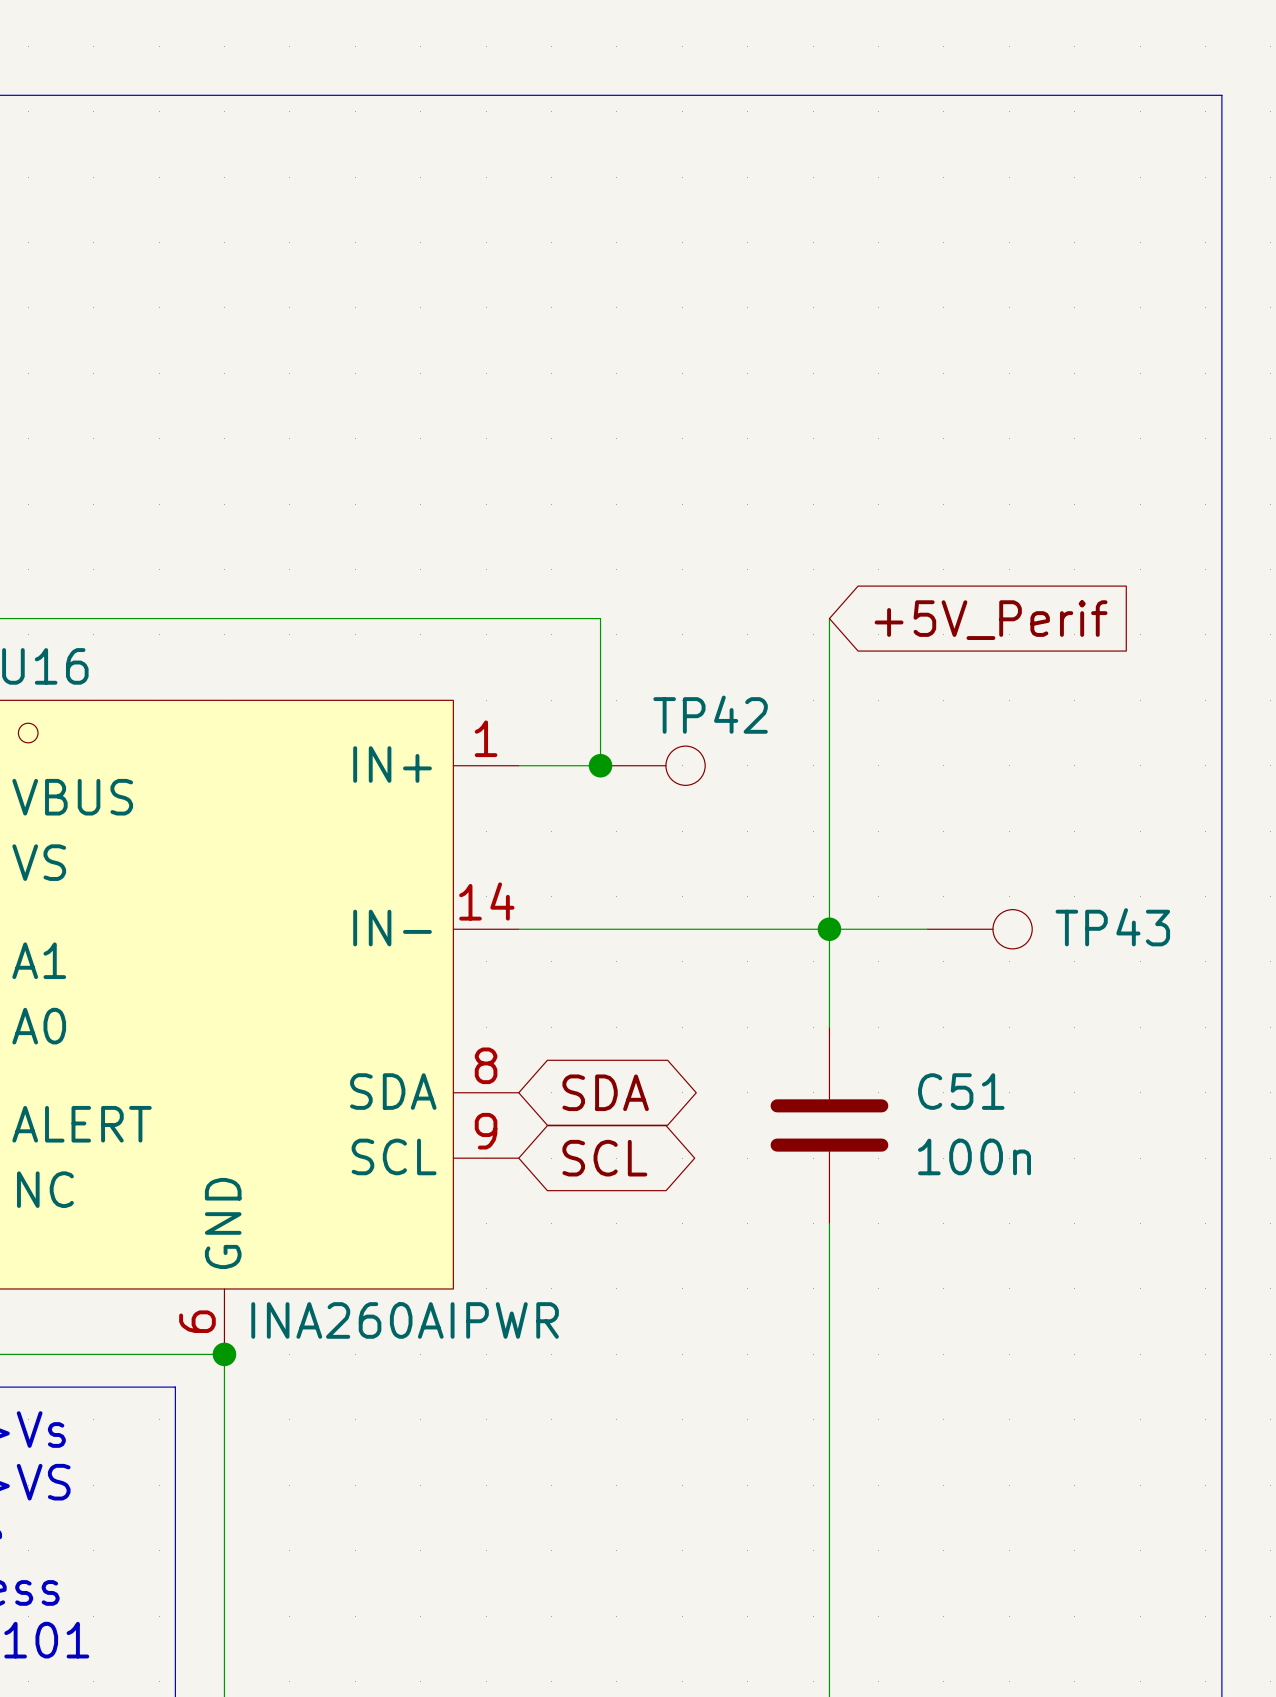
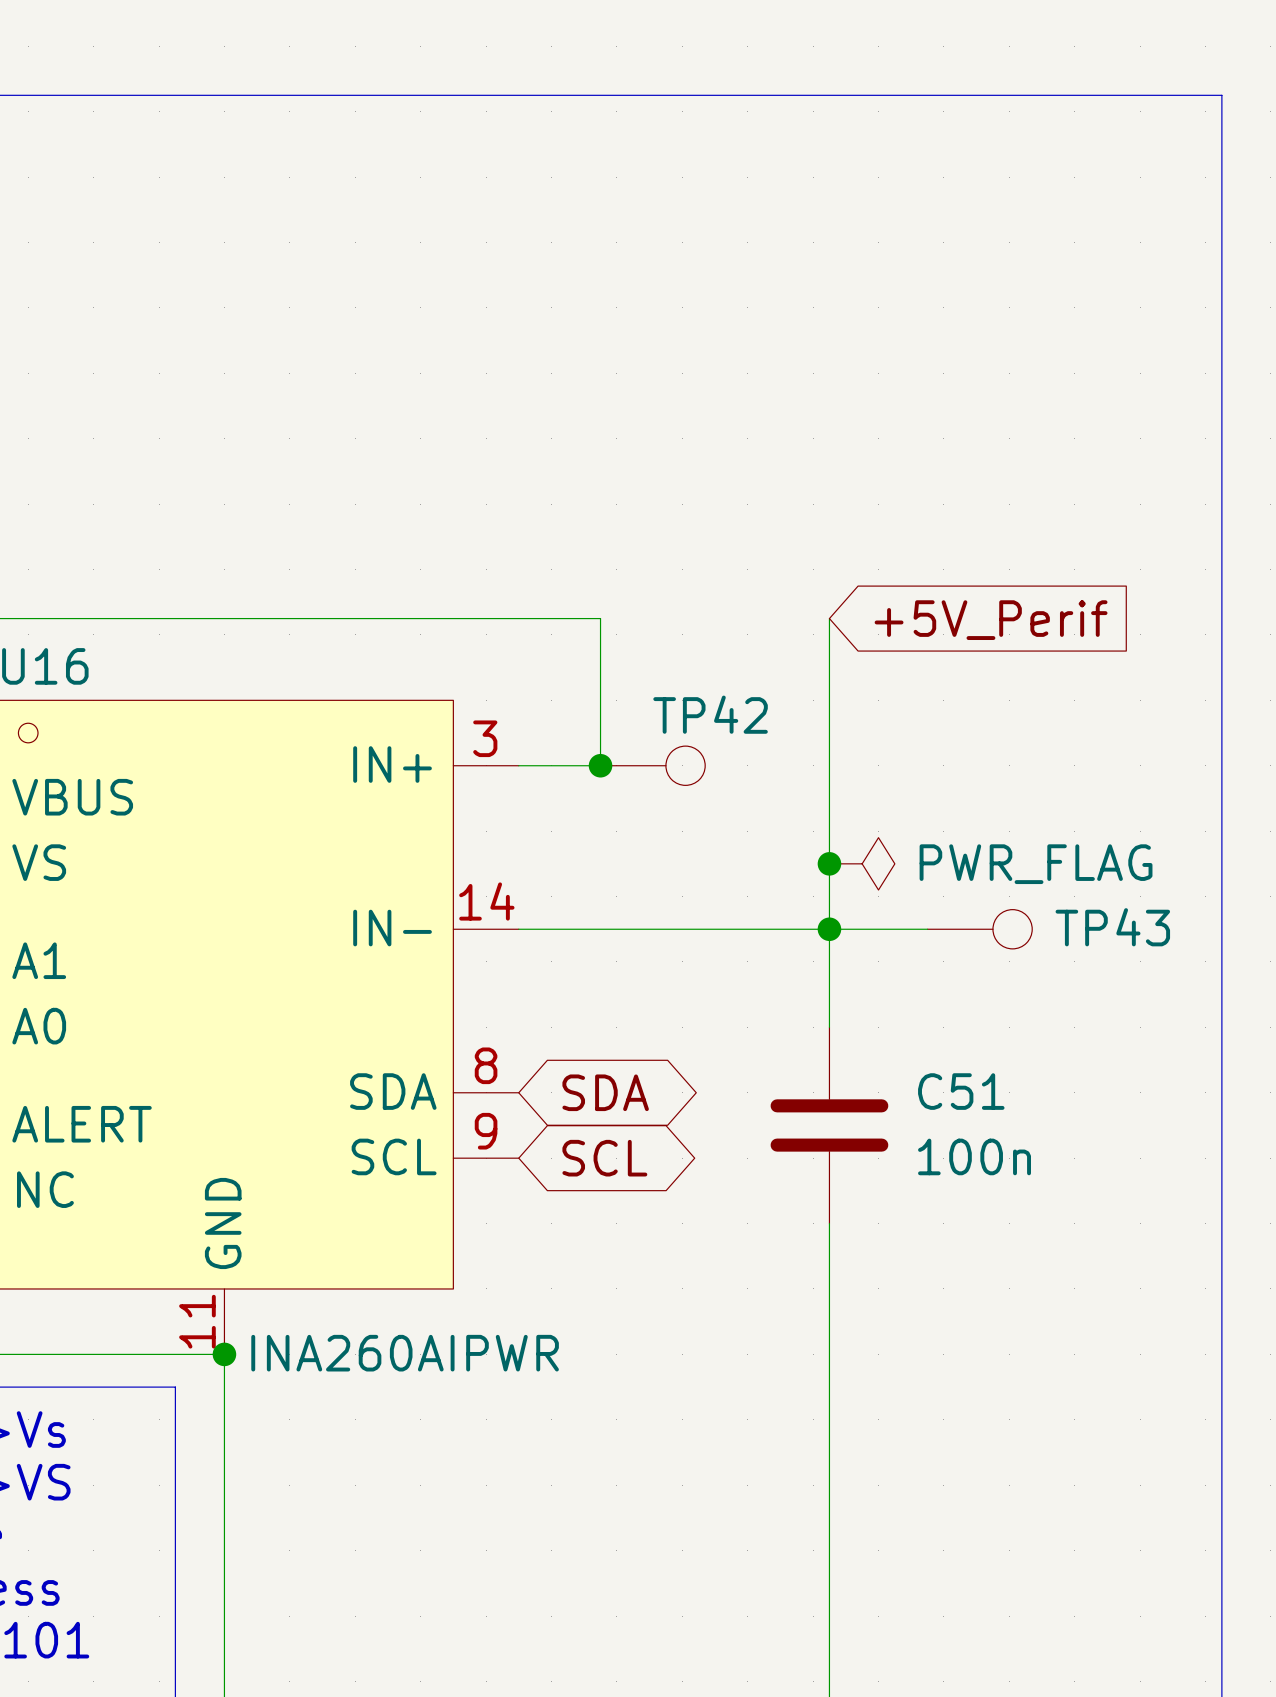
U16 pin number: 1 (486, 738) -> 3 (485, 738)
junction: none -> (829, 863)
power symbol: none -> PWR_FLAG (862, 863)
U16 value position: INA260AIPWR (405, 1320) -> INA260AIPWR (405, 1353)
U16 pin number: 6 (197, 1321) -> 11 (197, 1321)

